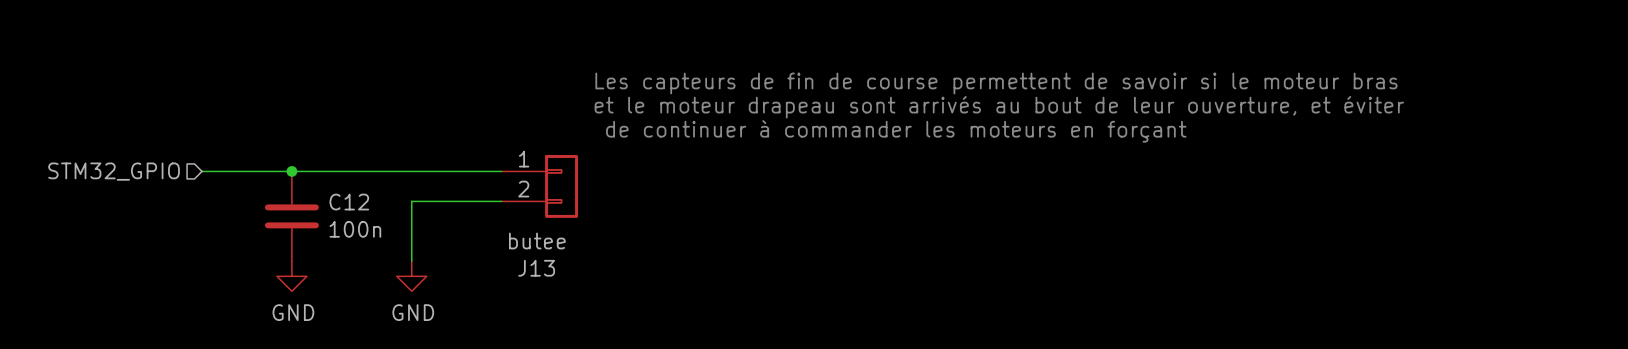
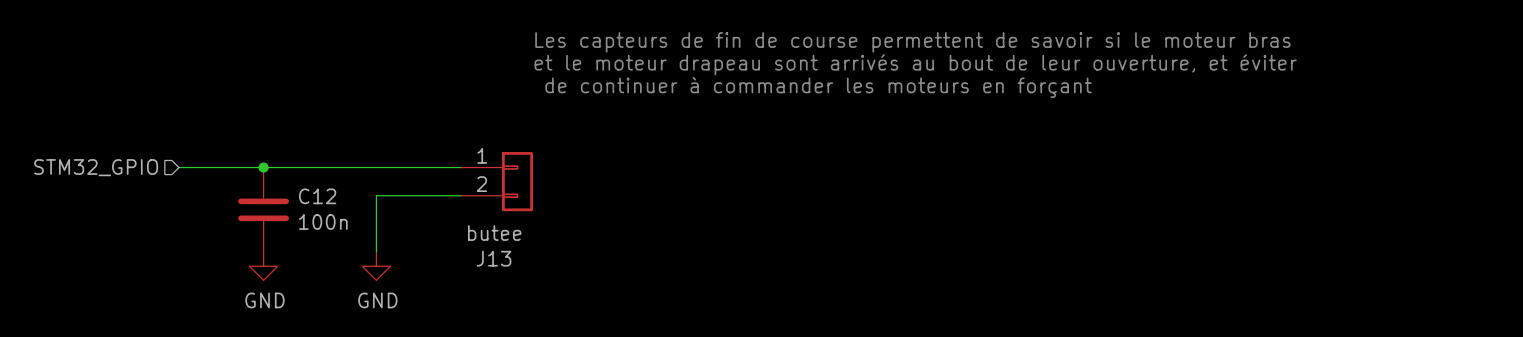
text position: Les capteurs de fin de course permettent de savoir si le moteur bras (996, 83) -> Les capteurs de fin de course permettent de savoir si le moteur bras (912, 42)
text position: et le moteur drapeau sont arrivés au bout de leur ouverture, et éviter (999, 107) -> et le moteur drapeau sont arrivés au bout de leur ouverture, et éviter (915, 64)
text position: de continuer à commander les moteurs en forçant (896, 131) -> de continuer à commander les moteurs en forçant (818, 87)

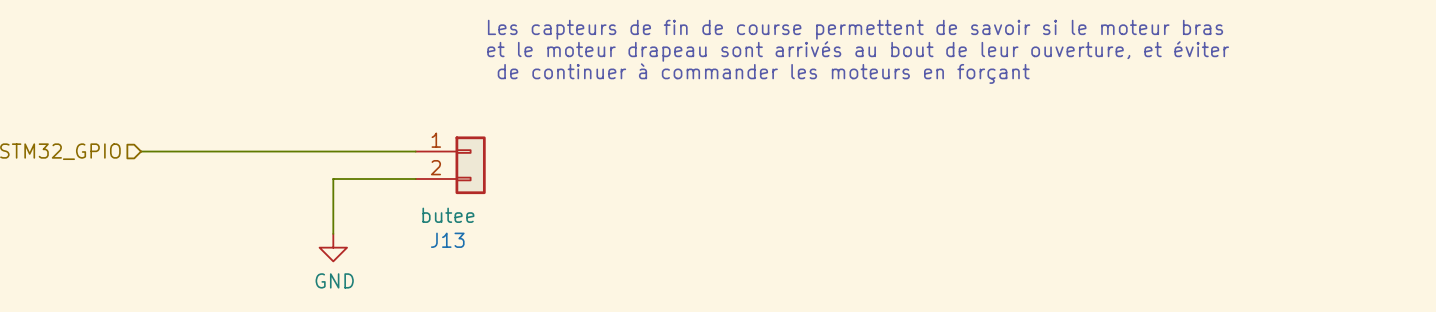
junction: (263, 167) -> none
C12: 100n (263, 209) -> none
power symbol: GND (263, 266) -> none

